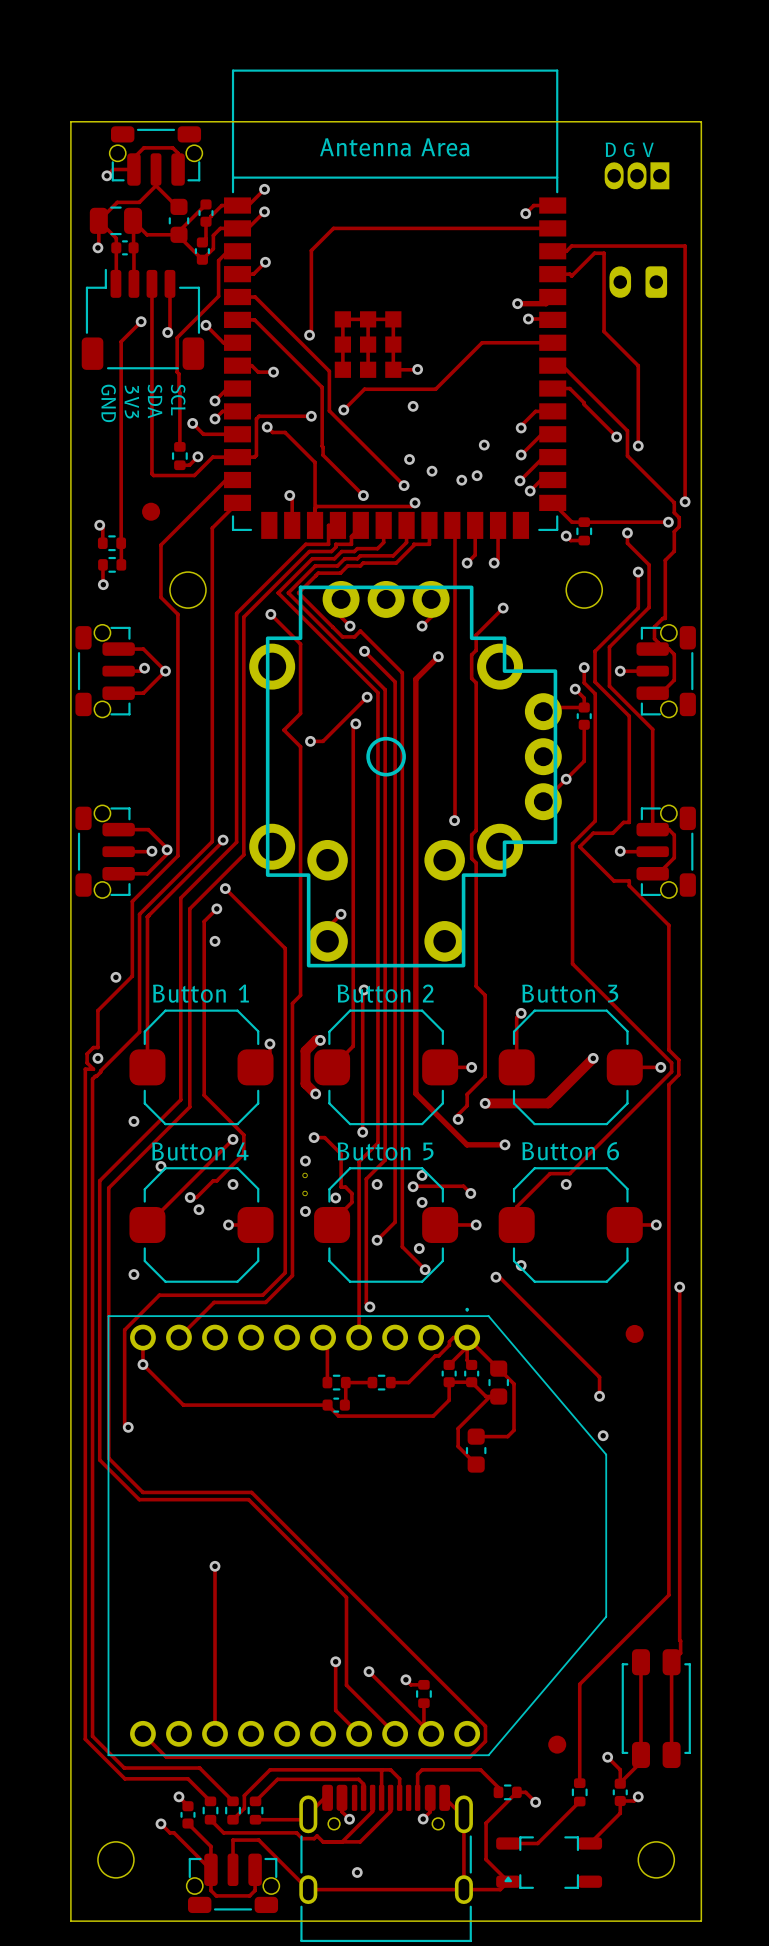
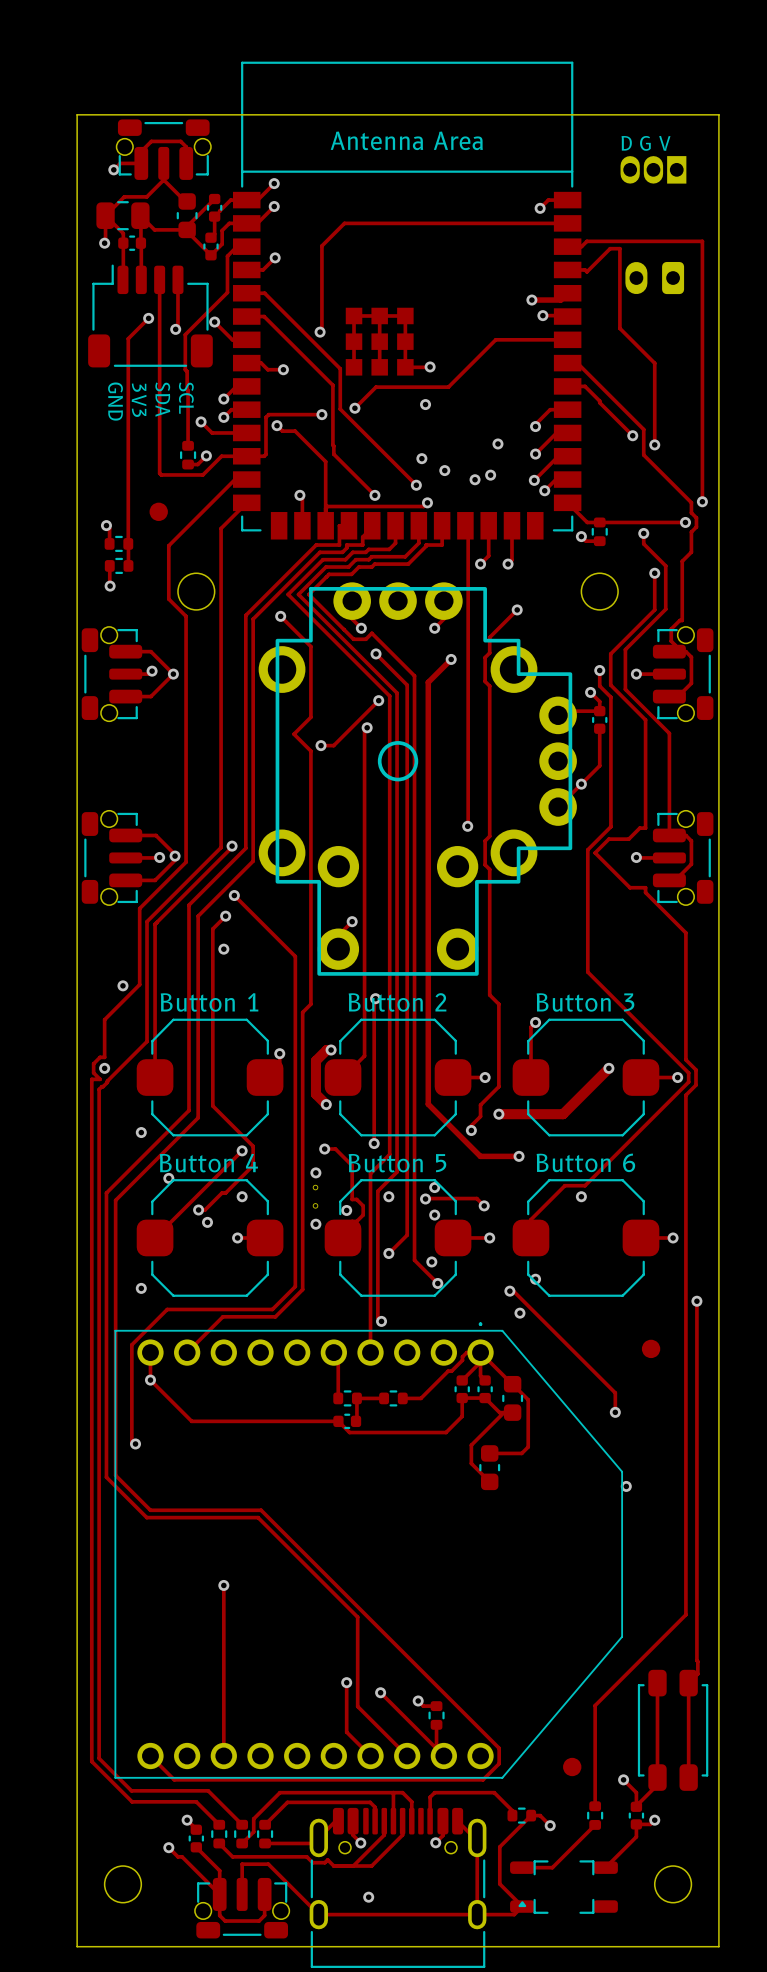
via: none -> (519, 1313)
via position: (603, 1435) -> (626, 1486)

